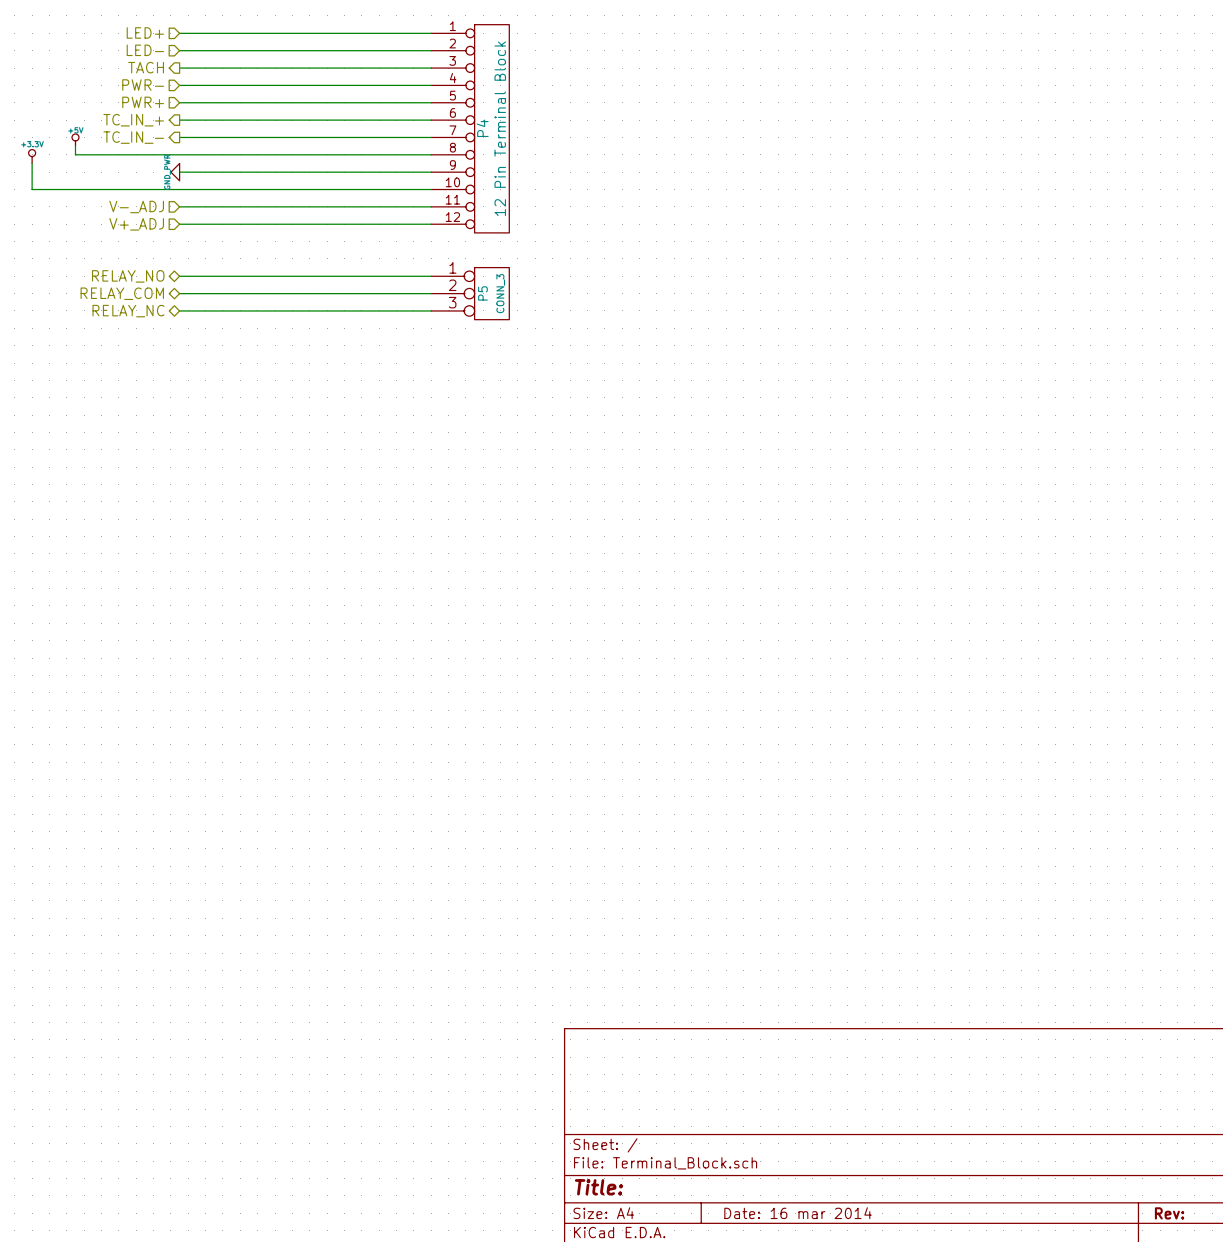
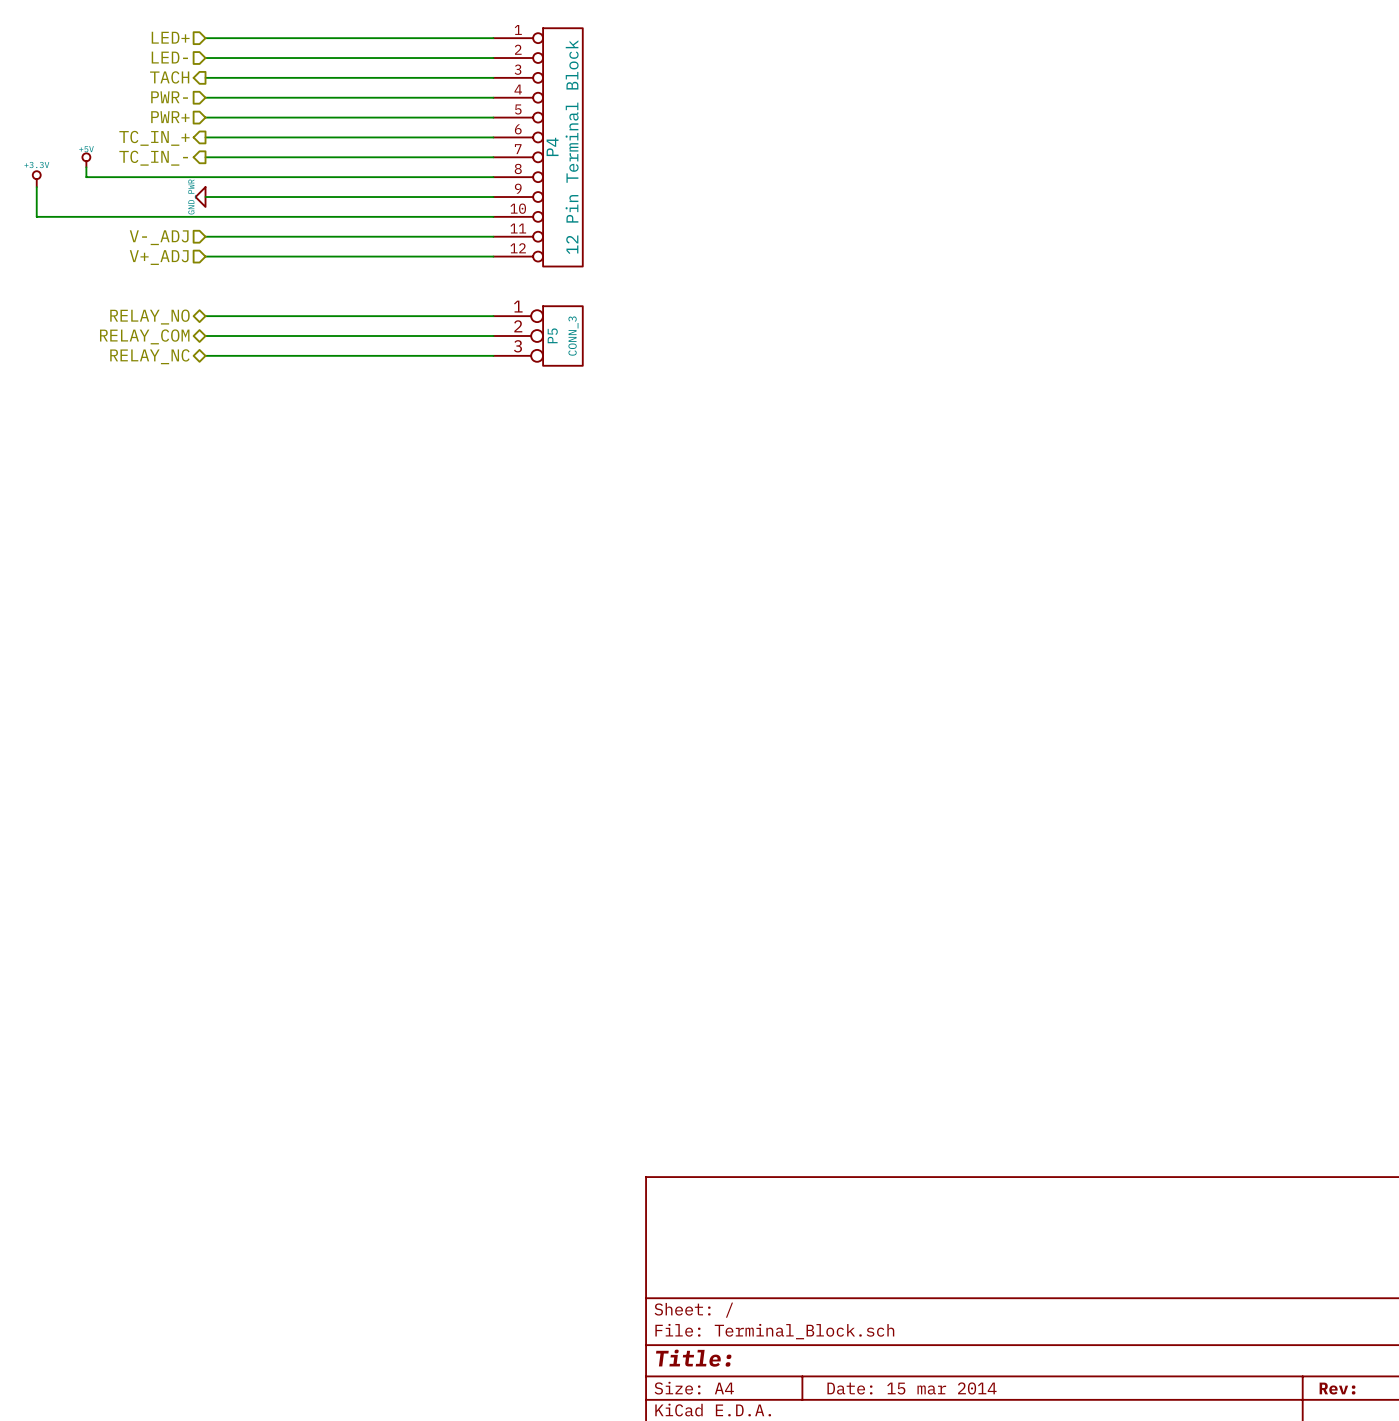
title block: Date: 16 mar 2014 (798, 1213) -> Date: 15 mar 2014 (912, 1388)

